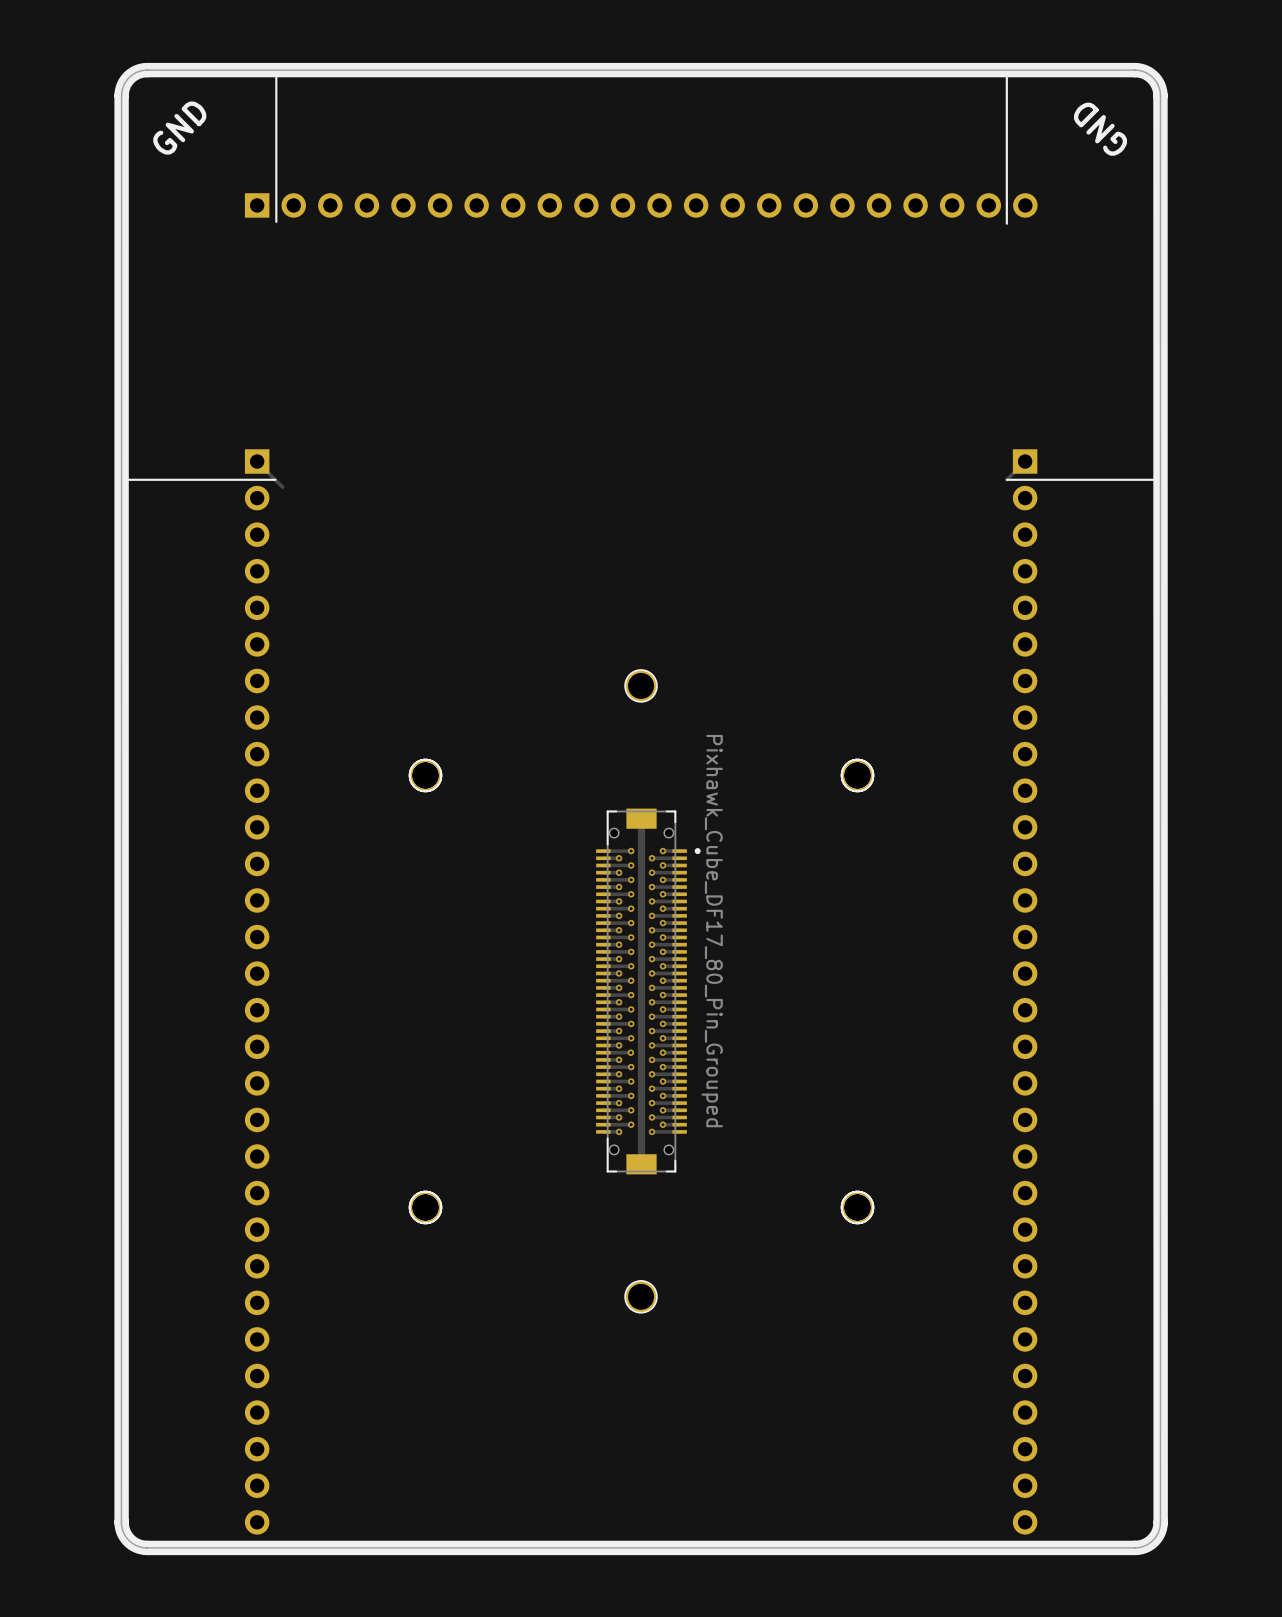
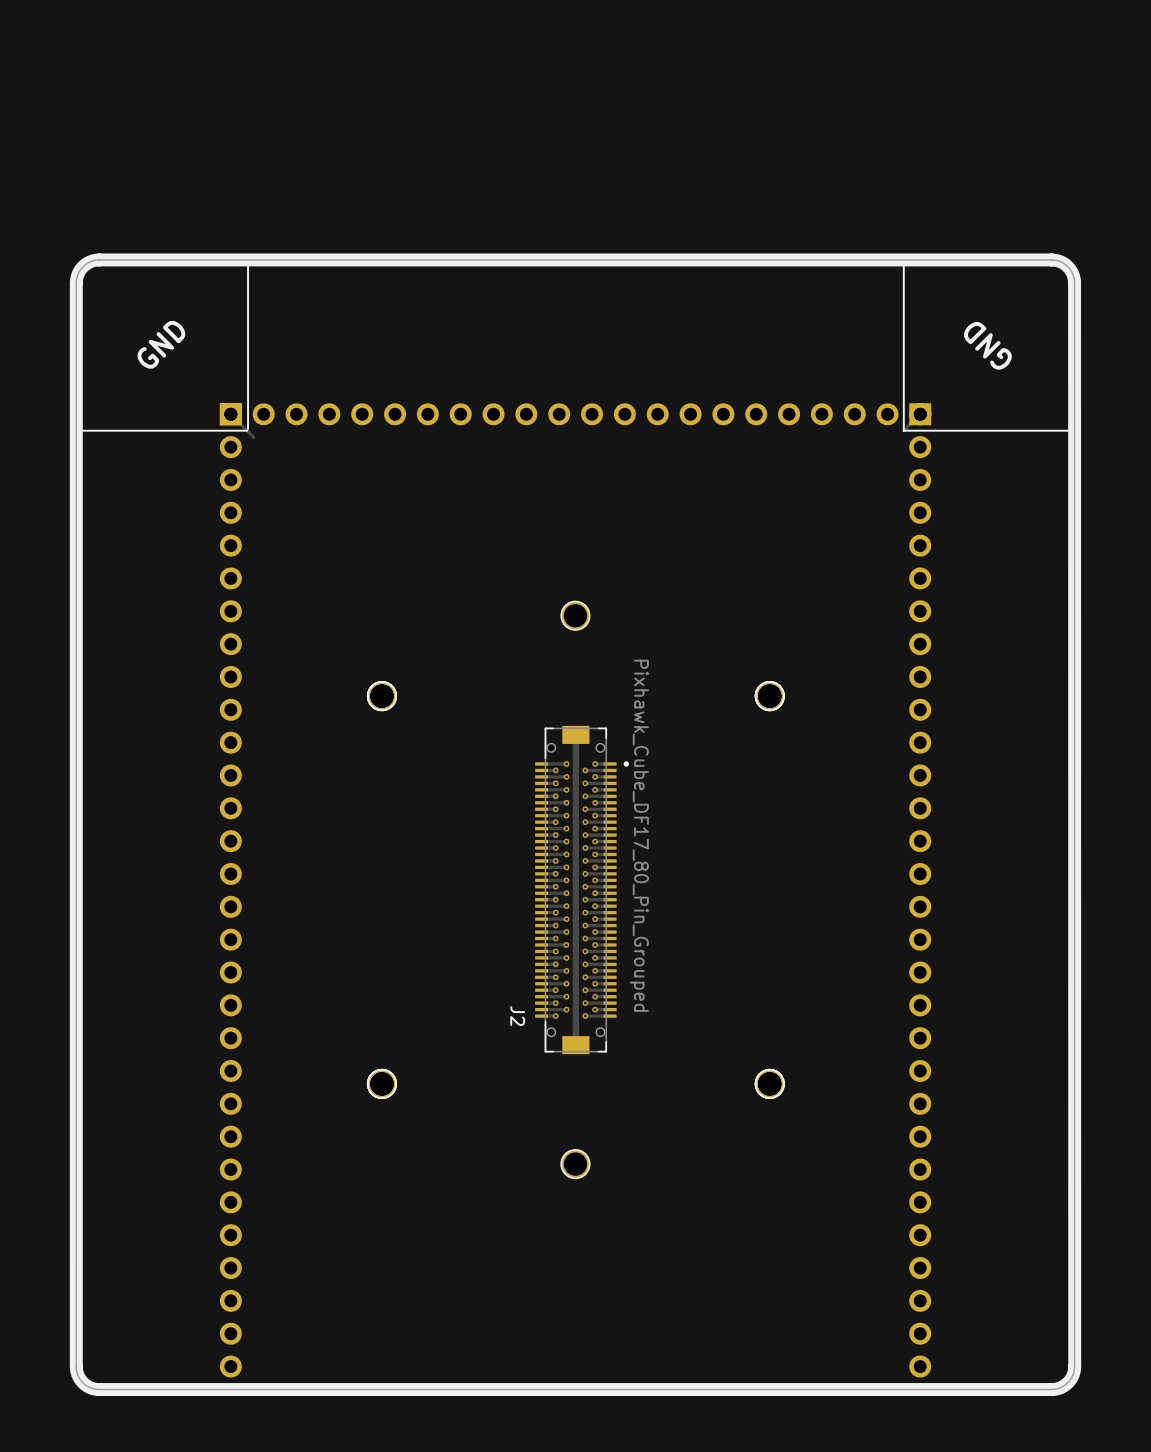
line: (276, 66) (276, 221) -> none
line: (1006, 66) (1006, 223) -> none
text position: GND (179, 128) -> GND (161, 344)
text position: GND (1100, 129) -> GND (987, 345)
part position: (641, 205) -> (575, 414)
line: none -> (248, 258) (248, 429)
line: none -> (903, 259) (903, 430)
line: none -> (105, 430) (76, 430)
line: none -> (1074, 430) (1045, 430)
J2 name: none -> J2 (517, 1016)
board edge: (1134, 1547) (1143, 1546) (1152, 1540) (1159, 1530) (1160, 1522) (1160, 95) (1157, 84) (1152, 77) (1143, 71) (1134, 70) (147, 70) (136, 72) (125, 82) (121, 95) (121, 1522) (123, 1533) (128, 1540) (138, 1546) (147, 1547) -> (1018, 1389) (1059, 1388) (1071, 1378) (1074, 1366) (1074, 282) (1073, 275) (1067, 266) (1061, 262) (1051, 259) (99, 259) (89, 262) (81, 268) (76, 282) (76, 1366) (79, 1378) (91, 1388) (131, 1389)
line: (1135, 1547) (1143, 1546) (1153, 1540) (1158, 1533) (1160, 1522) (1160, 95) (1159, 87) (1152, 77) (1145, 72) (1134, 70) (147, 70) (136, 72) (125, 82) (121, 95) (121, 1522) (123, 1530) (129, 1540) (138, 1546) (147, 1547) -> (1018, 1389) (1059, 1388) (1071, 1378) (1074, 1366) (1074, 282) (1069, 268) (1061, 262) (1051, 259) (99, 259) (91, 261) (83, 266) (77, 275) (76, 282) (76, 1366) (79, 1378) (91, 1388) (132, 1389)

